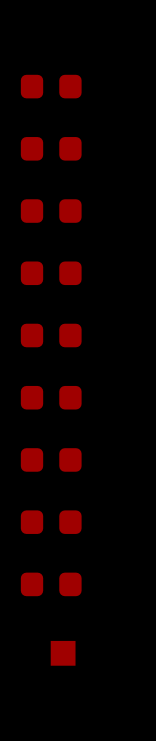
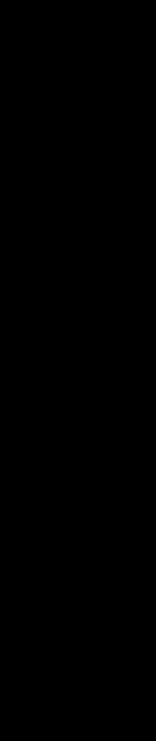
part: (51, 86) -> none
part: (51, 148) -> none
part: (51, 211) -> none
part: (51, 273) -> none
part: (51, 335) -> none
part: (51, 397) -> none
part: (51, 459) -> none
part: (51, 522) -> none
part: (51, 584) -> none
part: (63, 653) -> none

